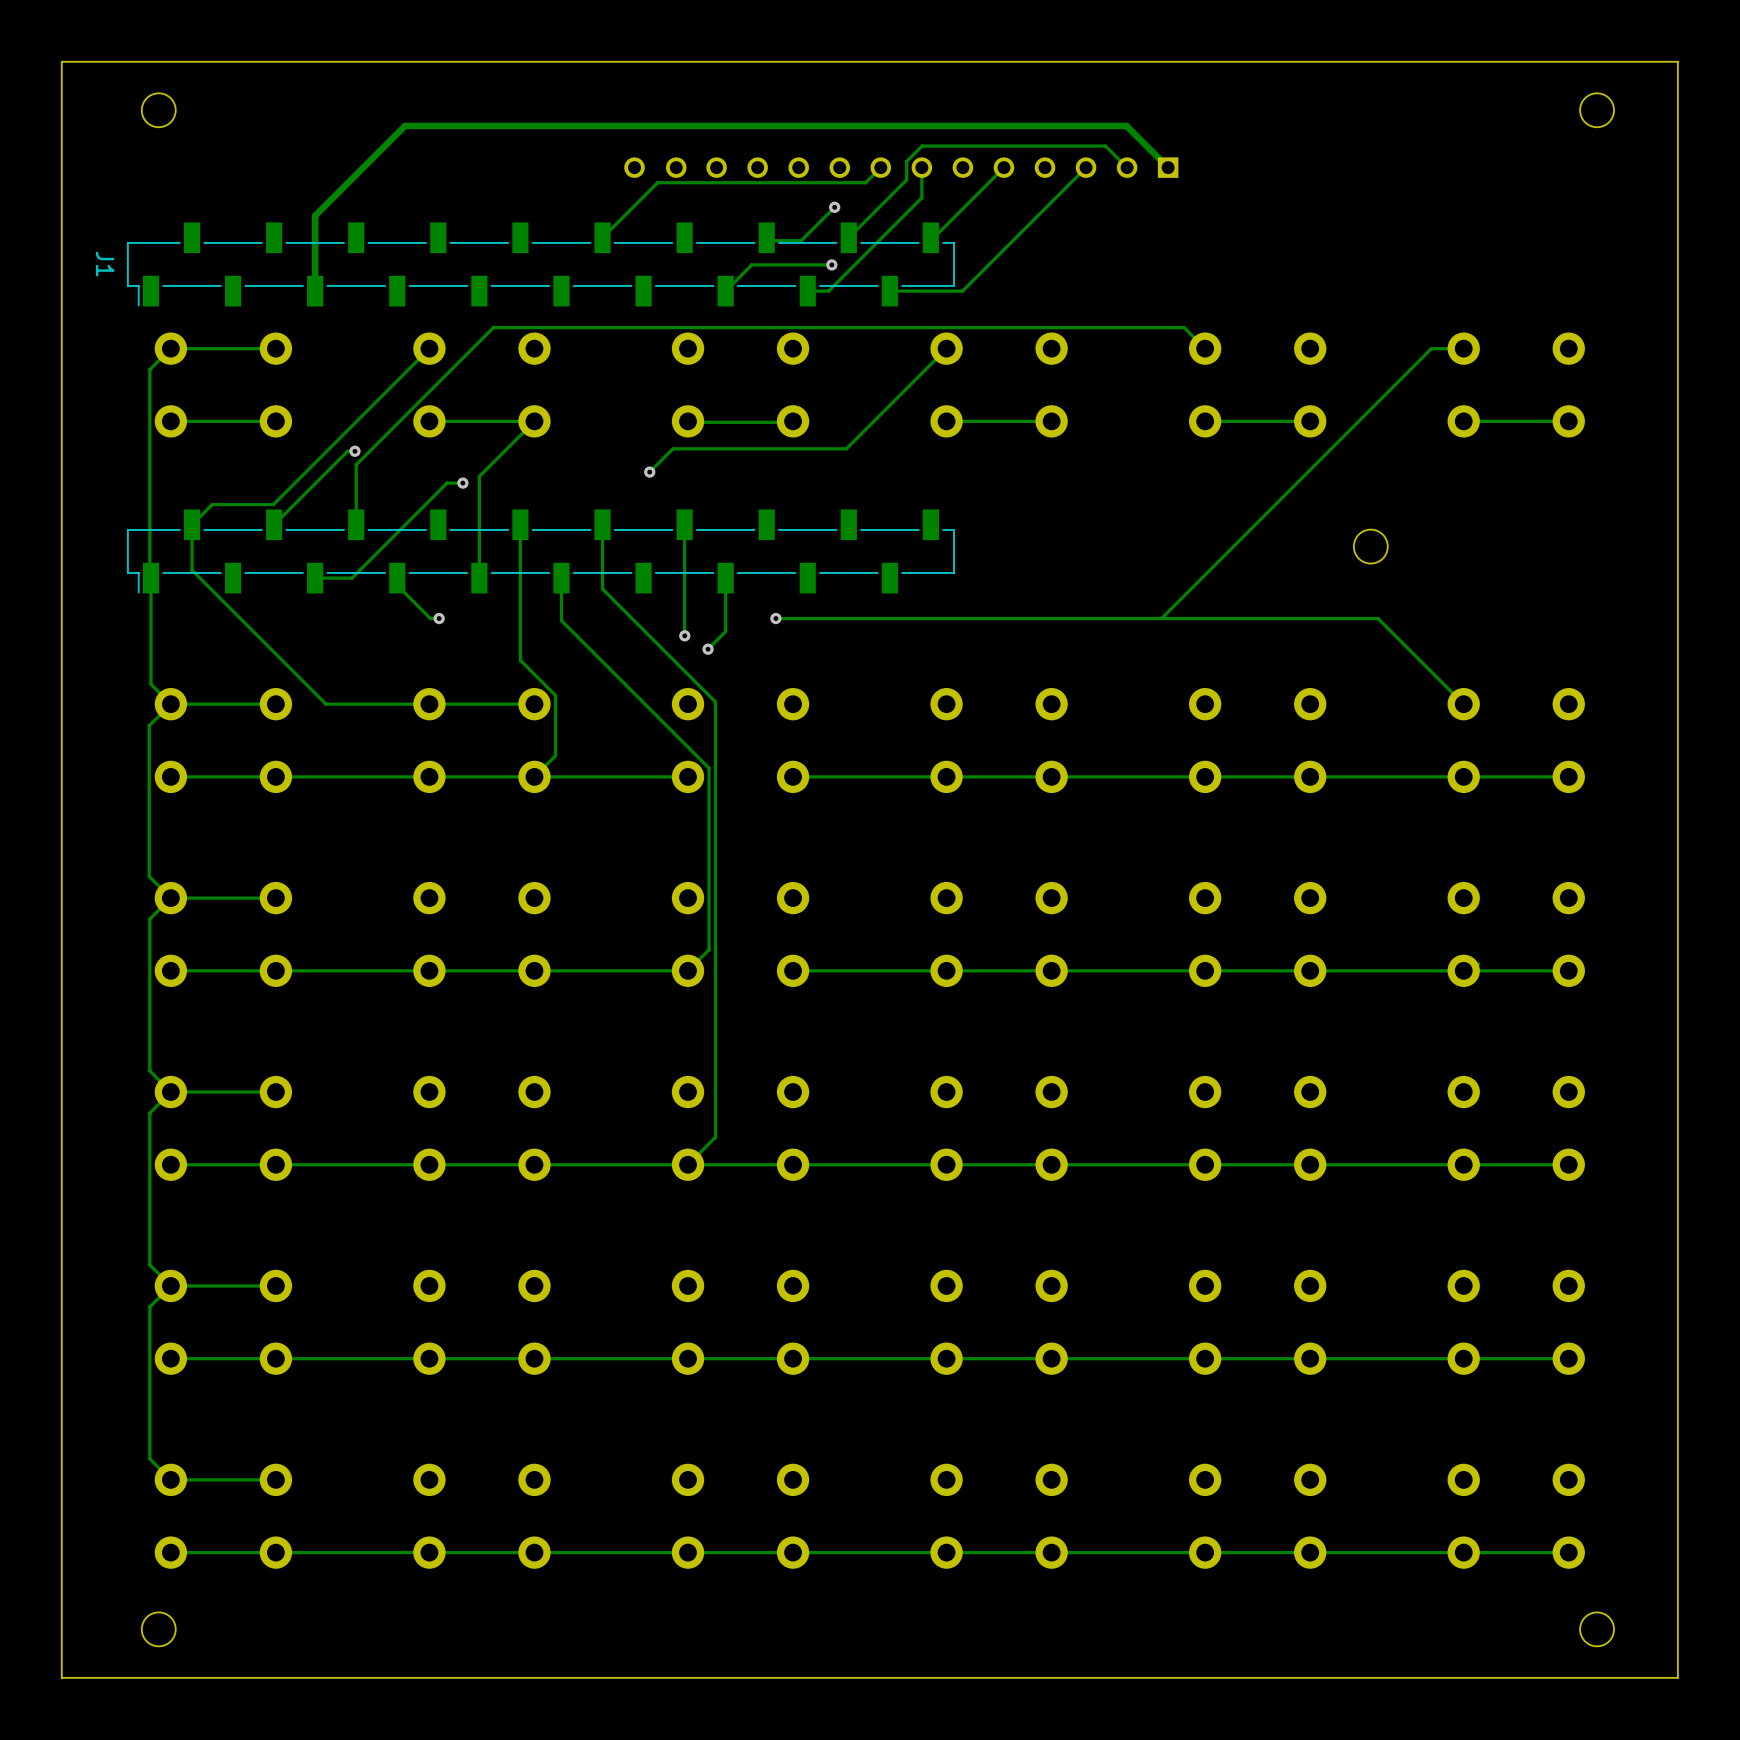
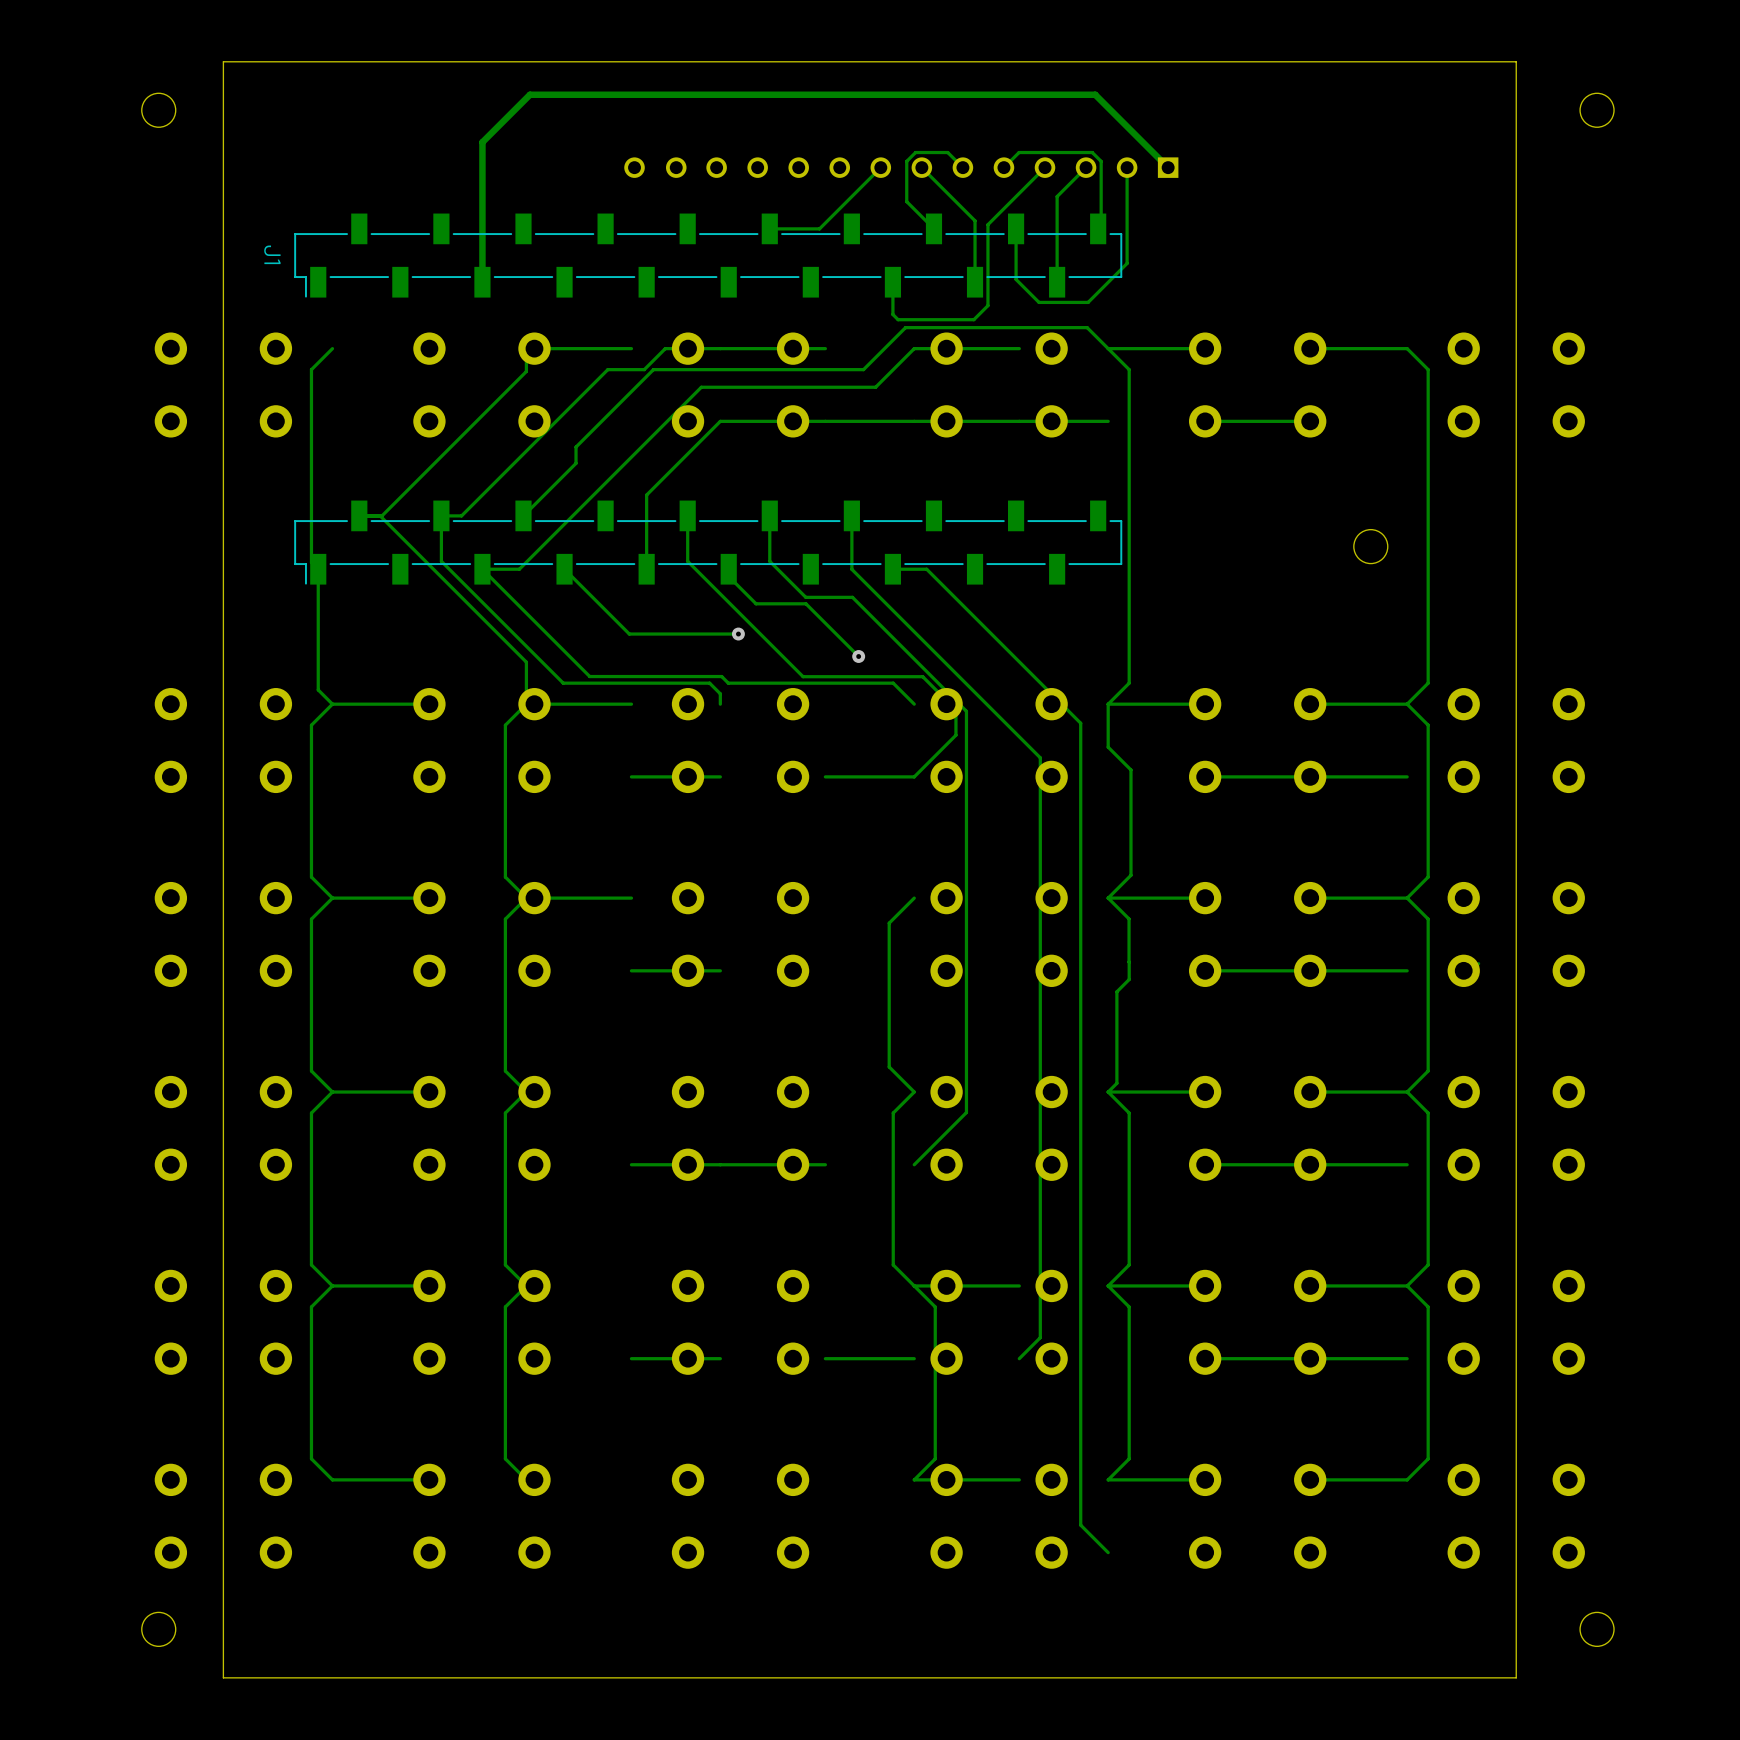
board edge: (223, 61) (61, 61) (61, 1677) (223, 1677) -> (223, 61) (223, 1677)
board edge: (1516, 61) (1677, 61) (1677, 1677) (1516, 1677) -> (1516, 61) (1516, 1677)
track: (1126, 125) (405, 125) (315, 215) (315, 291) -> (1126, 125) (1095, 94) (529, 94) (482, 142) (482, 282)
track: (915, 152) (922, 146) (1105, 146) (1127, 167) -> (1016, 228) (1016, 279) (1039, 302) (1088, 302) (1127, 263) (1127, 167)
track: none -> (915, 152) (947, 152) (962, 167)
track: (921, 167) (921, 197) (828, 291) (807, 291) -> (921, 167) (975, 220) (975, 282)
track: (1003, 167) (933, 237) (930, 237) -> (1003, 167) (1019, 152) (1092, 152) (1101, 161) (1101, 225) (1098, 228)
track: none -> (1045, 167) (987, 224) (987, 305) (973, 319) (898, 319) (892, 314) (892, 282)
track: (906, 179) (848, 237) -> (906, 179) (906, 201) (933, 228)
track: (865, 182) (657, 182) (602, 237) -> (865, 182) (819, 228) (769, 228)
track: (1057, 196) (962, 291) (889, 291) -> (1057, 196) (1057, 282)
track: (834, 207) (801, 240) (768, 240) -> none
via: (834, 207) -> none
J1 position: (540, 264) -> (708, 255)
track: (831, 264) (751, 264) (725, 291) -> none
via: (831, 264) -> none
track: (905, 327) (493, 327) (356, 464) (356, 524) -> (905, 327) (863, 369) (653, 369) (576, 447) (576, 463) (523, 515)
track: (1087, 327) (1184, 327) (1205, 348) -> (1087, 327) (1129, 369) (1129, 683) (1108, 704)
track: (275, 348) (170, 348) (149, 369) (150, 684) (170, 704) -> none
track: none -> (332, 348) (311, 369) (311, 562) (318, 569) (318, 689) (332, 704) (311, 725) (311, 877) (332, 898)
track: (429, 348) (273, 504) (212, 504) (192, 524) (192, 570) (326, 704) (332, 704) -> none
track: none -> (631, 348) (526, 348) (526, 371) (382, 515) (359, 515)
track: none -> (825, 348) (665, 348) (644, 369) (607, 369) (461, 515) (441, 515) (441, 561) (563, 683) (709, 683) (720, 693) (720, 704)
track: (946, 348) (846, 448) (672, 448) (649, 472) -> none
track: none -> (1019, 348) (914, 348) (875, 387) (701, 387) (519, 569) (482, 569) (589, 676) (721, 676) (728, 683) (893, 683) (914, 704)
track: none -> (1213, 348) (1108, 348)
track: none -> (1302, 348) (1407, 348) (1428, 369) (1428, 683) (1407, 704)
track: (1463, 348) (1431, 348) (1161, 618) -> none
track: (275, 421) (170, 421) -> none
track: (429, 421) (534, 421) (479, 476) (479, 578) -> none
track: (793, 421) (793, 430) (785, 422) (688, 421) -> none
track: none -> (946, 421) (720, 421) (646, 495) (646, 569)
track: none -> (1108, 421) (1051, 421)
track: (1568, 421) (1463, 421) -> (1407, 704) (1302, 704)
track: (354, 451) (347, 451) (274, 524) -> none
via: (354, 451) -> none
via: (649, 472) -> none
track: (462, 483) (447, 483) (352, 578) (315, 578) -> none
via: (462, 483) -> none
track: none -> (380, 515) (526, 662) (526, 704) (505, 725) (505, 877) (526, 898)
track: none -> (769, 515) (769, 561) (805, 597) (852, 597) (966, 711) (966, 1112) (914, 1164)
track: none -> (851, 515) (851, 569) (1040, 757) (1040, 1337) (1019, 1358)
track: (520, 524) (520, 660) (555, 695) (555, 755) (534, 776) -> none
track: (602, 524) (602, 588) (715, 701) (715, 1137) (688, 1164) -> none
track: (684, 524) (684, 635) -> none
part position: (540, 551) -> (708, 542)
track: none -> (564, 569) (629, 634) (738, 634)
track: none -> (728, 569) (728, 576) (756, 603) (805, 603) (858, 656)
track: none -> (892, 569) (926, 569) (1080, 723) (1080, 1525) (1108, 1552)
track: (397, 578) (397, 585) (430, 618) (439, 618) -> none
track: (561, 578) (561, 620) (709, 768) (709, 949) (688, 970) -> (720, 970) (688, 970)
track: (725, 578) (725, 631) (708, 649) -> none
via: (439, 618) -> none
track: (775, 618) (1378, 618) (1463, 704) -> none
via: (775, 618) -> none
via: none -> (738, 634)
via: (684, 635) -> none
via: (708, 649) -> none
via: none -> (858, 656)
track: (170, 704) (149, 725) (149, 876) (170, 898) -> none
track: (275, 704) (170, 704) -> none
track: (526, 704) (437, 704) -> none
track: none -> (631, 704) (534, 704)
track: none -> (1108, 704) (1108, 747) (1130, 769) (1130, 875) (1108, 898)
track: none -> (1213, 704) (1108, 704)
track: none -> (1407, 704) (1428, 725) (1428, 877) (1407, 898)
track: (631, 776) (170, 776) -> none
track: (825, 776) (793, 776) -> (720, 776) (688, 776)
track: (1213, 776) (914, 776) -> (687, 515) (687, 561) (803, 676) (922, 676) (955, 709) (955, 735) (914, 776)
track: (1568, 776) (1407, 776) -> none
track: (170, 898) (149, 919) (149, 1071) (170, 1092) -> (332, 898) (311, 919) (311, 1071) (332, 1092)
track: (275, 898) (170, 898) -> (437, 898) (332, 898)
track: none -> (526, 898) (505, 919) (505, 1071) (526, 1092) (505, 1113) (505, 1264) (526, 1285) (505, 1306) (505, 1458) (526, 1479)
track: none -> (631, 898) (526, 898)
track: none -> (914, 898) (889, 923) (889, 1066) (914, 1092) (893, 1113) (893, 1264) (935, 1306) (935, 1458) (914, 1479) (1019, 1479)
track: none -> (1108, 898) (1129, 918) (1129, 961)
track: none -> (1213, 898) (1108, 898)
track: none -> (1407, 898) (1302, 898)
track: none -> (1407, 898) (1428, 919) (1428, 1071) (1407, 1092)
track: none -> (1129, 962) (1129, 979) (1116, 991) (1116, 1083) (1108, 1092)
track: (631, 970) (170, 970) -> none
track: (1213, 970) (793, 970) -> none
track: (1568, 970) (1407, 970) -> none
track: (170, 1092) (149, 1113) (149, 1264) (170, 1285) -> (332, 1092) (311, 1113) (311, 1264) (332, 1285)
track: (275, 1092) (170, 1092) -> (437, 1092) (332, 1092)
track: none -> (1108, 1092) (1129, 1113) (1129, 1264) (1108, 1285)
track: none -> (1213, 1092) (1108, 1092)
track: none -> (1407, 1092) (1428, 1113) (1428, 1264) (1407, 1285)
track: none -> (1407, 1092) (1302, 1092)
track: (631, 1164) (170, 1164) -> none
track: (1213, 1164) (825, 1164) -> none
track: (1568, 1164) (1407, 1164) -> none
track: (170, 1285) (149, 1306) (149, 1458) (170, 1479) (275, 1479) -> (332, 1285) (311, 1306) (311, 1458) (332, 1479) (437, 1479)
track: (275, 1285) (170, 1285) -> (437, 1285) (332, 1285)
track: none -> (1108, 1285) (1129, 1306) (1129, 1458) (1108, 1479) (1213, 1479)
track: none -> (1213, 1285) (1108, 1285)
track: none -> (1407, 1285) (1302, 1285)
track: none -> (1407, 1285) (1428, 1306) (1428, 1458) (1407, 1479) (1302, 1479)
track: (631, 1358) (170, 1358) -> none
track: (825, 1358) (720, 1358) -> (1019, 1285) (914, 1285)
track: (1213, 1358) (914, 1358) -> none
track: (1568, 1358) (1407, 1358) -> none
track: (1568, 1552) (170, 1552) -> none

